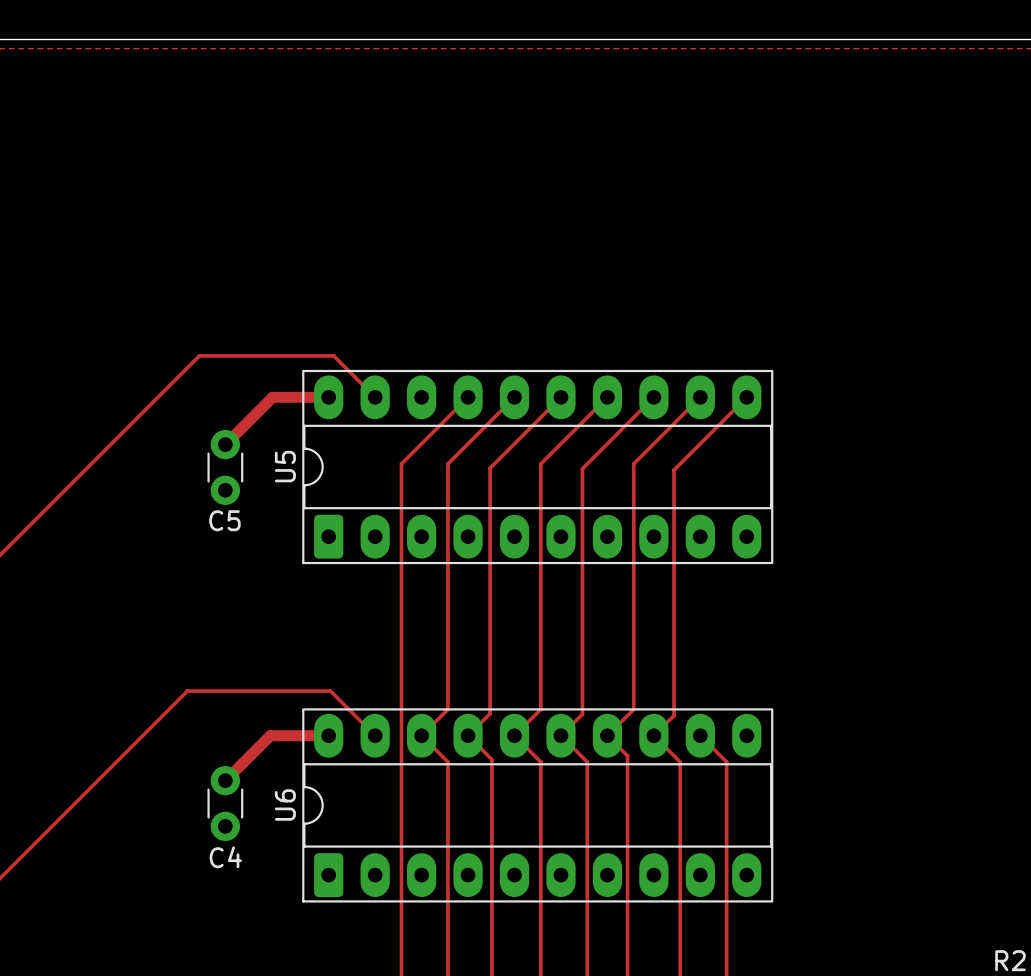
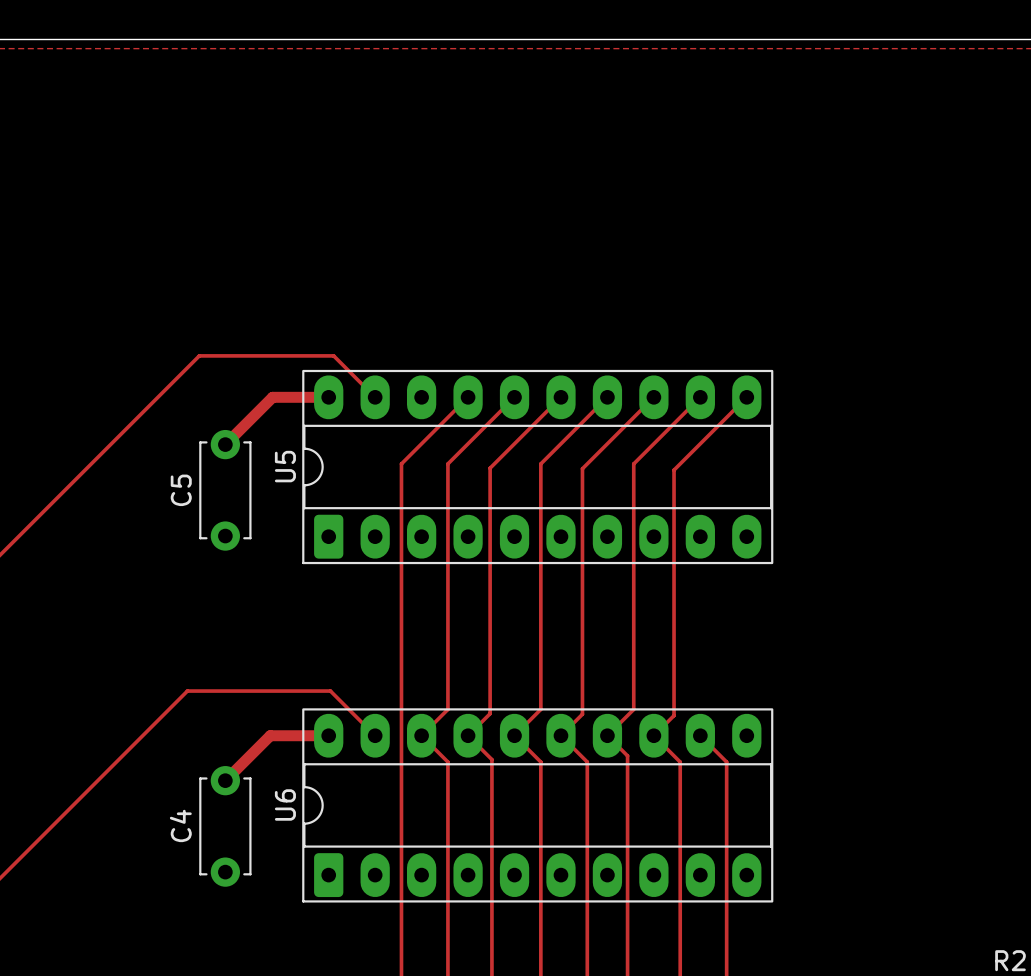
C5 footprint: [207, 429, 244, 505] -> [199, 429, 252, 551]
C5 name position: C5 (224, 520) -> C5 (181, 490)
C4 footprint: [207, 766, 244, 842] -> [199, 766, 252, 887]
C4 name position: C4 (225, 857) -> C4 (180, 825)

